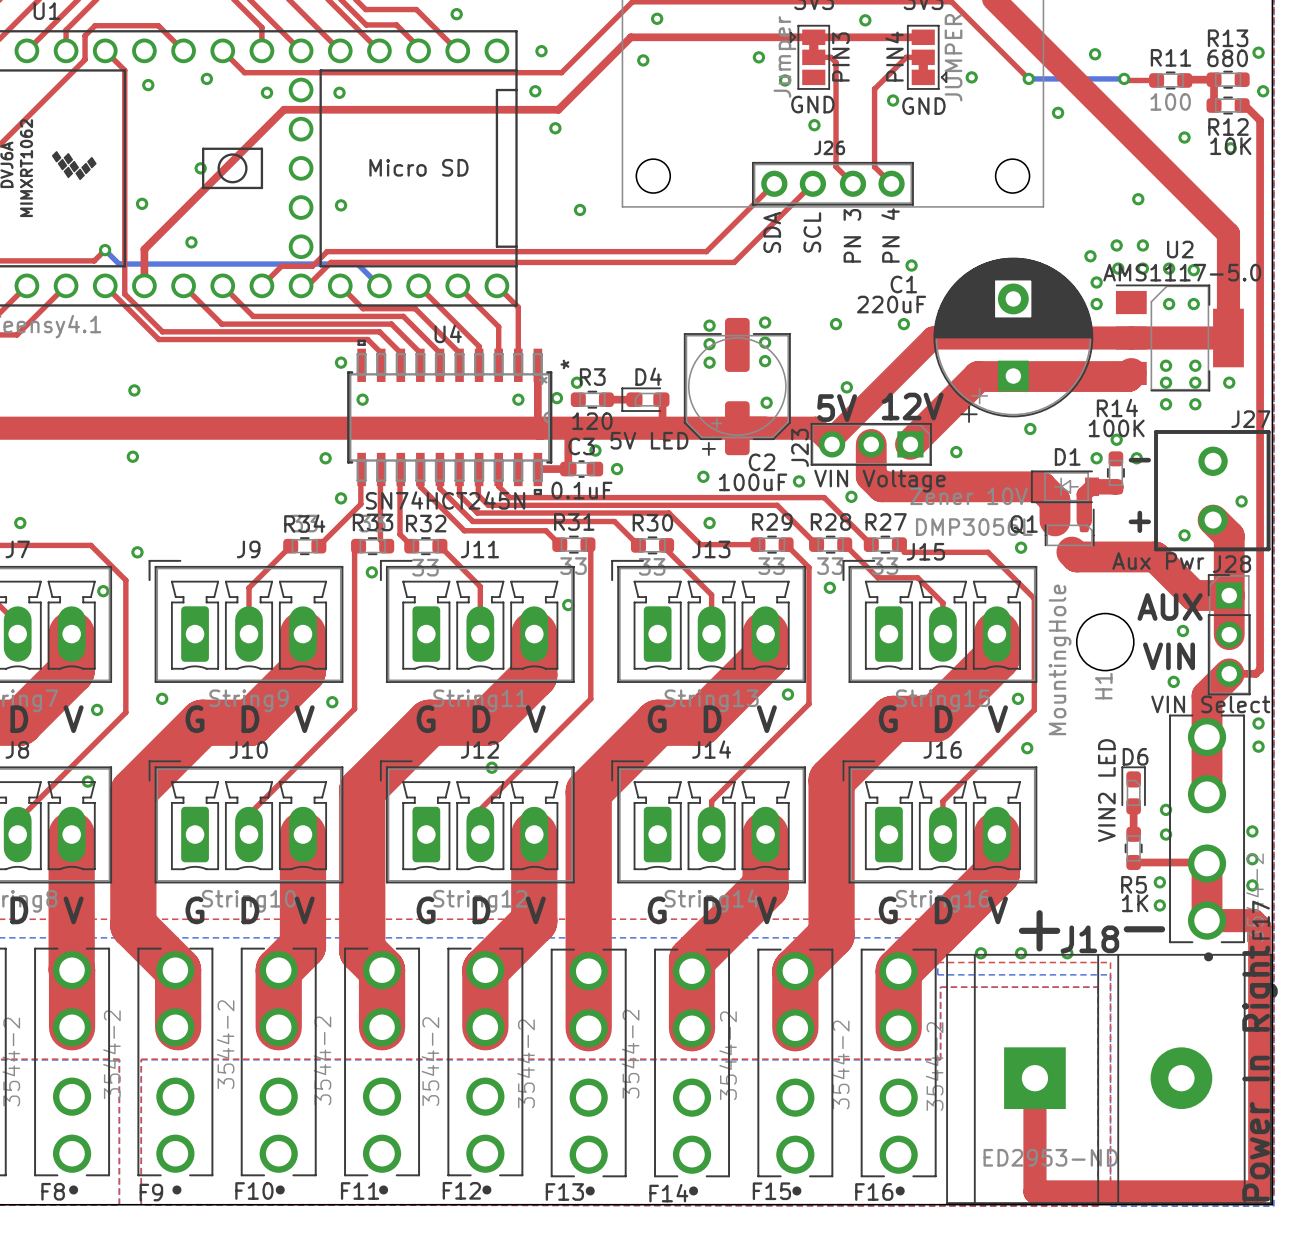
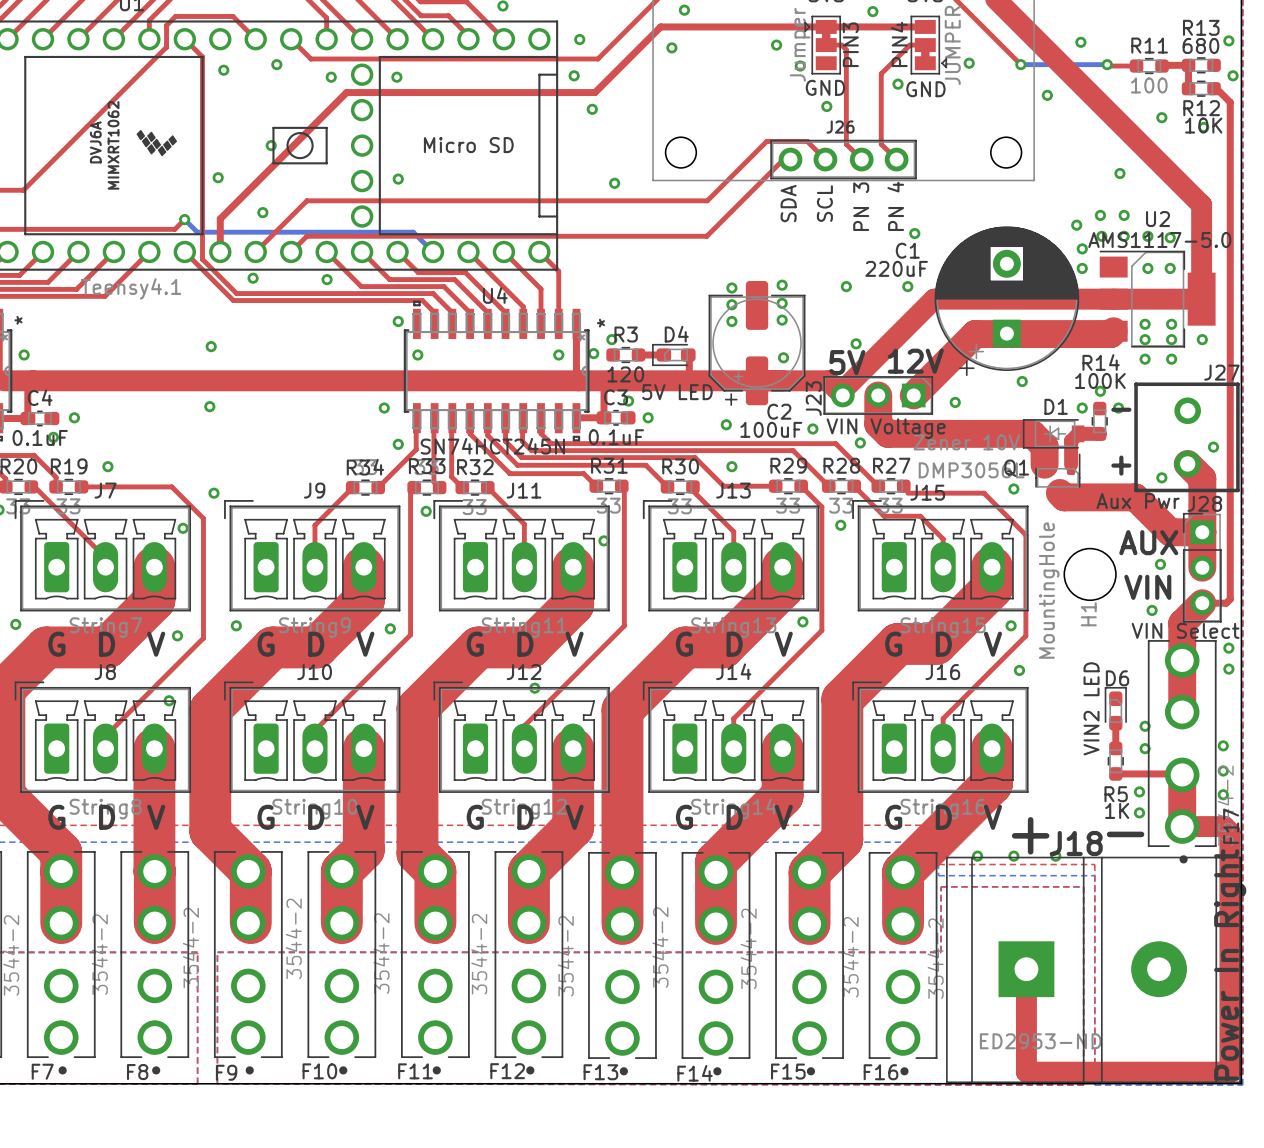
top track: (774, 183) (706, 251) (327, 251) (312, 266) (281, 266) (261, 285) -> (790, 159) (783, 159) (706, 236) (306, 236) (291, 251)
top track: (812, 183) (734, 262) (331, 262) (307, 285) (301, 285) -> (825, 159) (807, 141) (766, 141) (707, 200) (306, 200) (255, 251)
top track: (183, 285) (221, 324) (300, 324) -> (326, 251) (361, 286)
top track: (222, 285) (253, 316) (331, 316) -> (362, 251) (389, 279)
via: none -> (253, 278)
via: none -> (327, 279)

